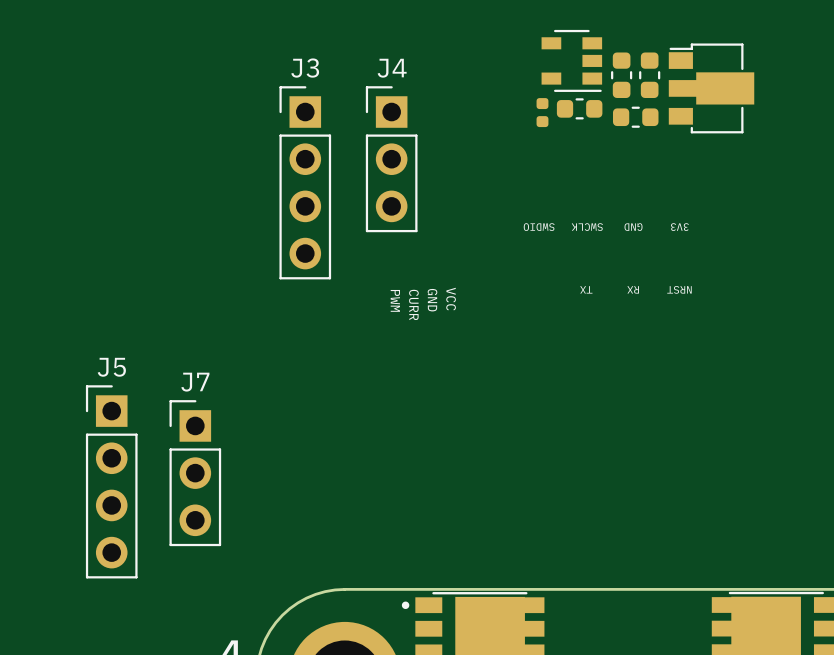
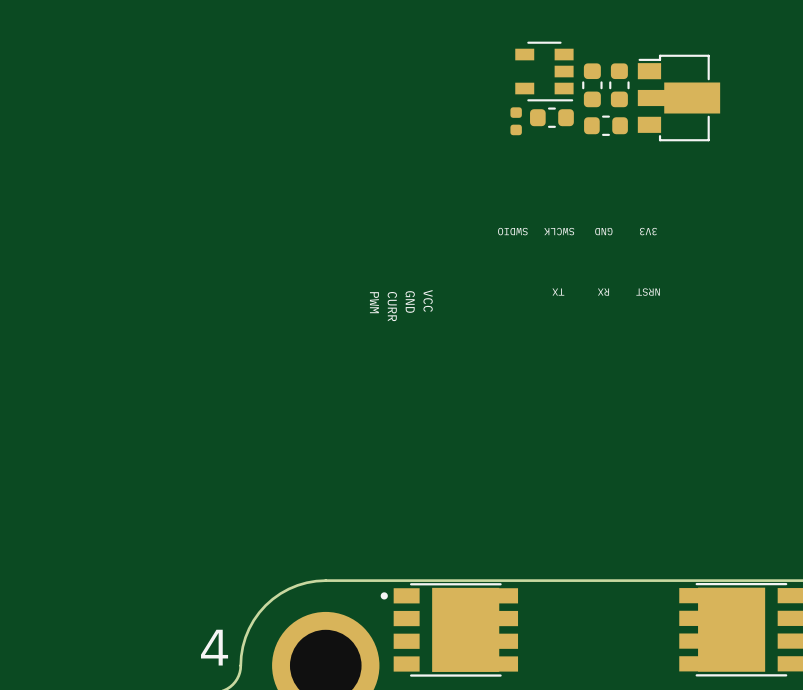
J4: (391, 159) -> none
J3: (305, 182) -> none
J7: (195, 473) -> none
J5: (111, 481) -> none

